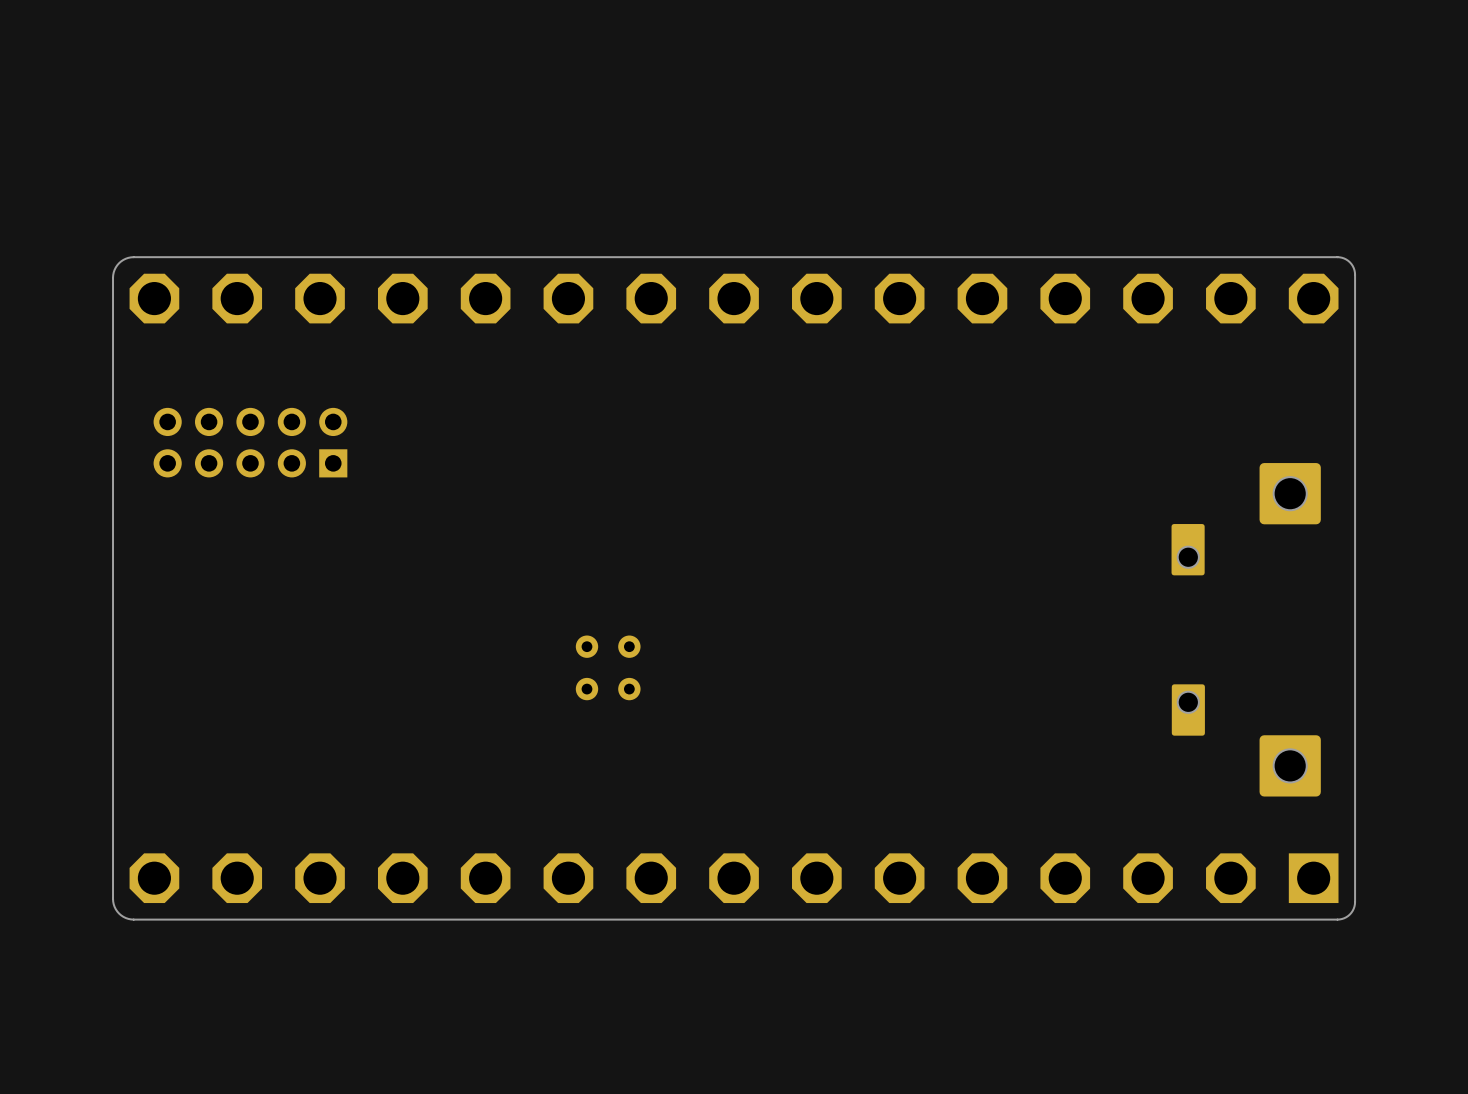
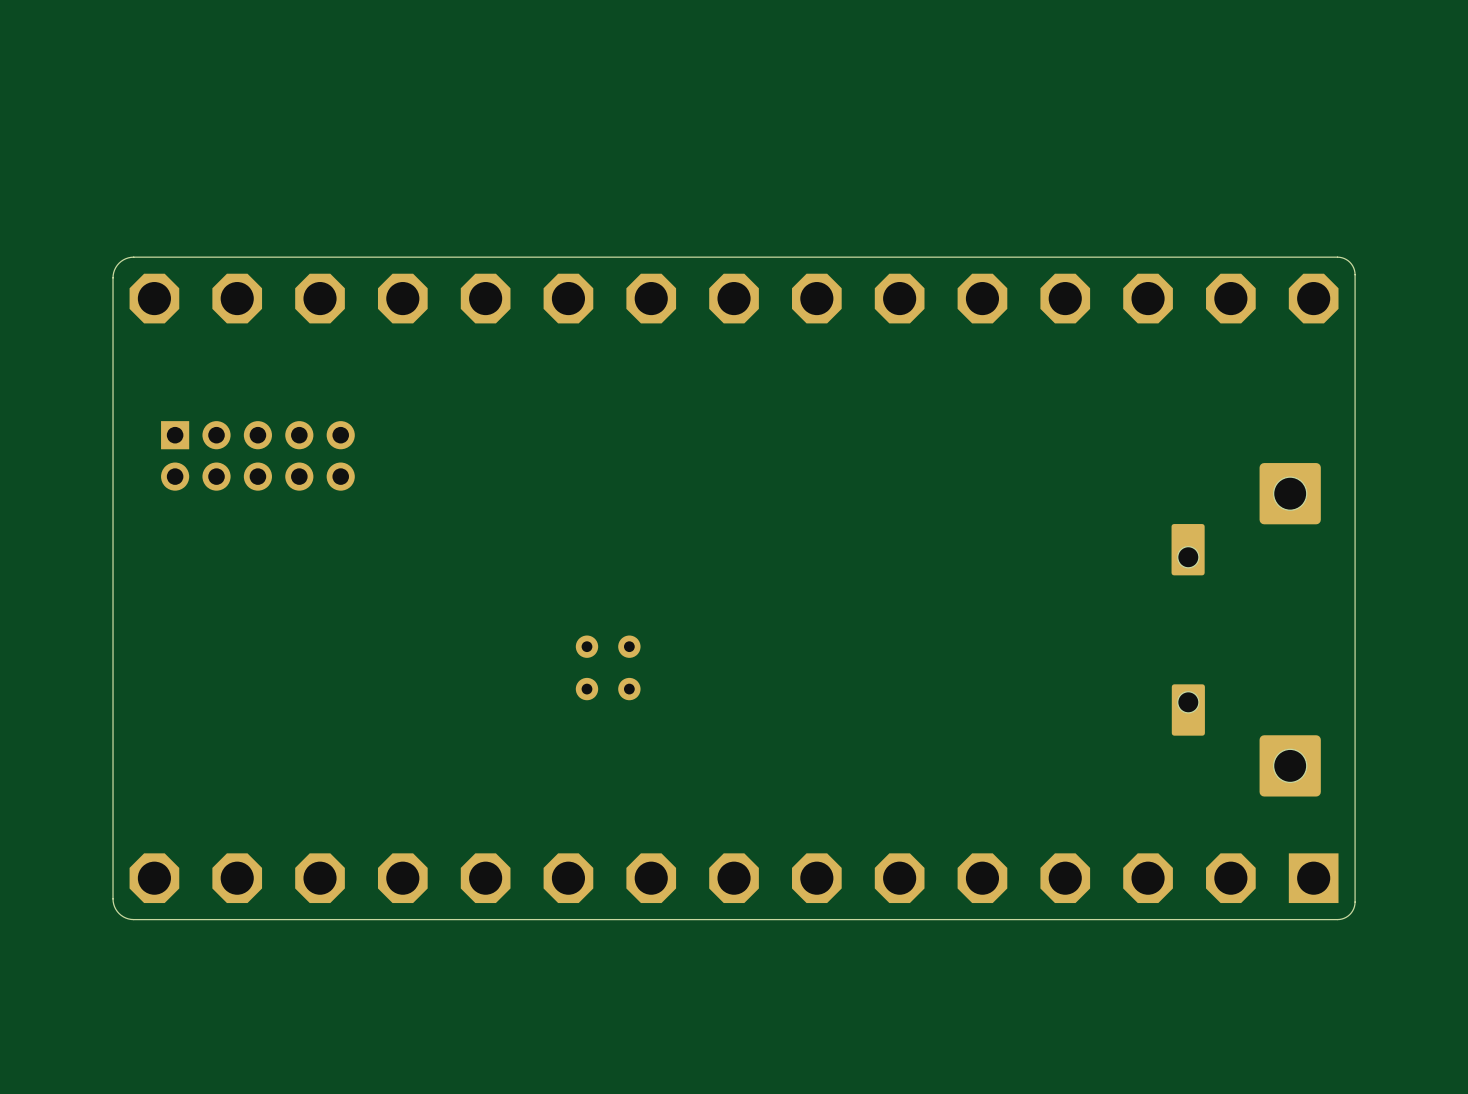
part rotation: 0° (250, 442) -> 180° (257, 455)

